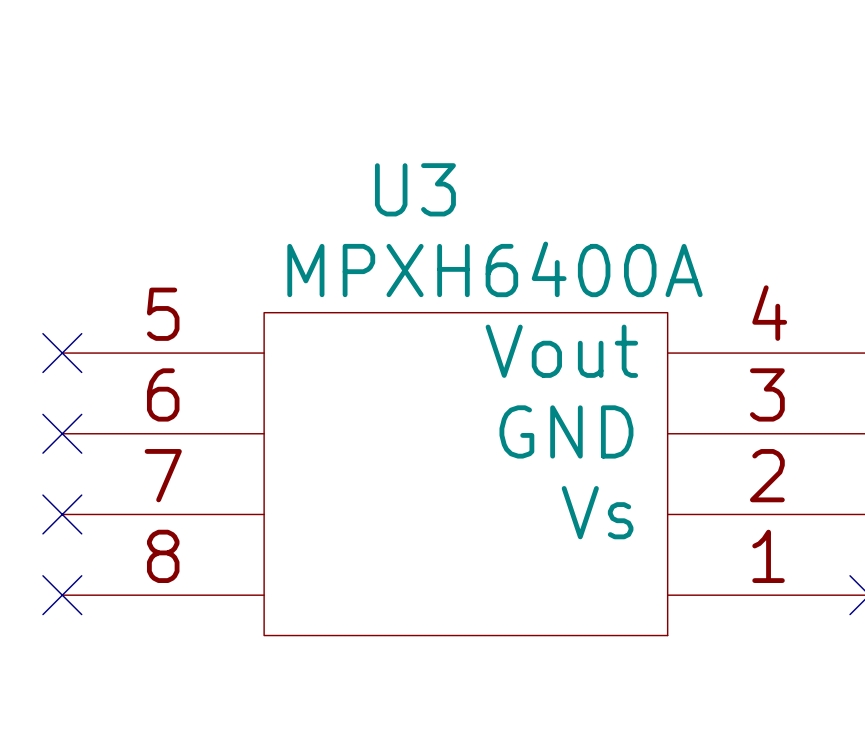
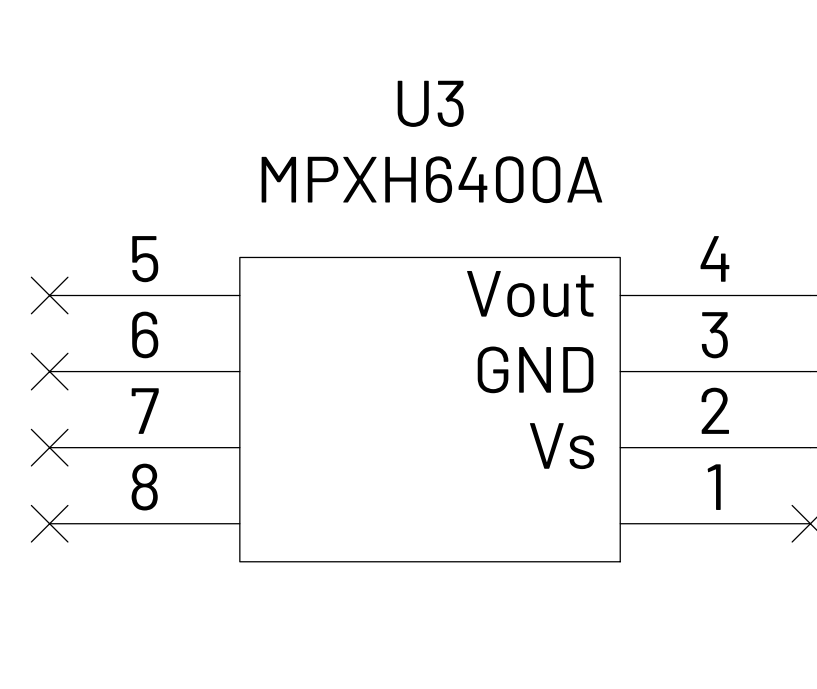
U3 name position: U3 (415, 189) -> U3 (430, 103)
U3 value position: MPXH6400A (494, 269) -> MPXH6400A (431, 179)

